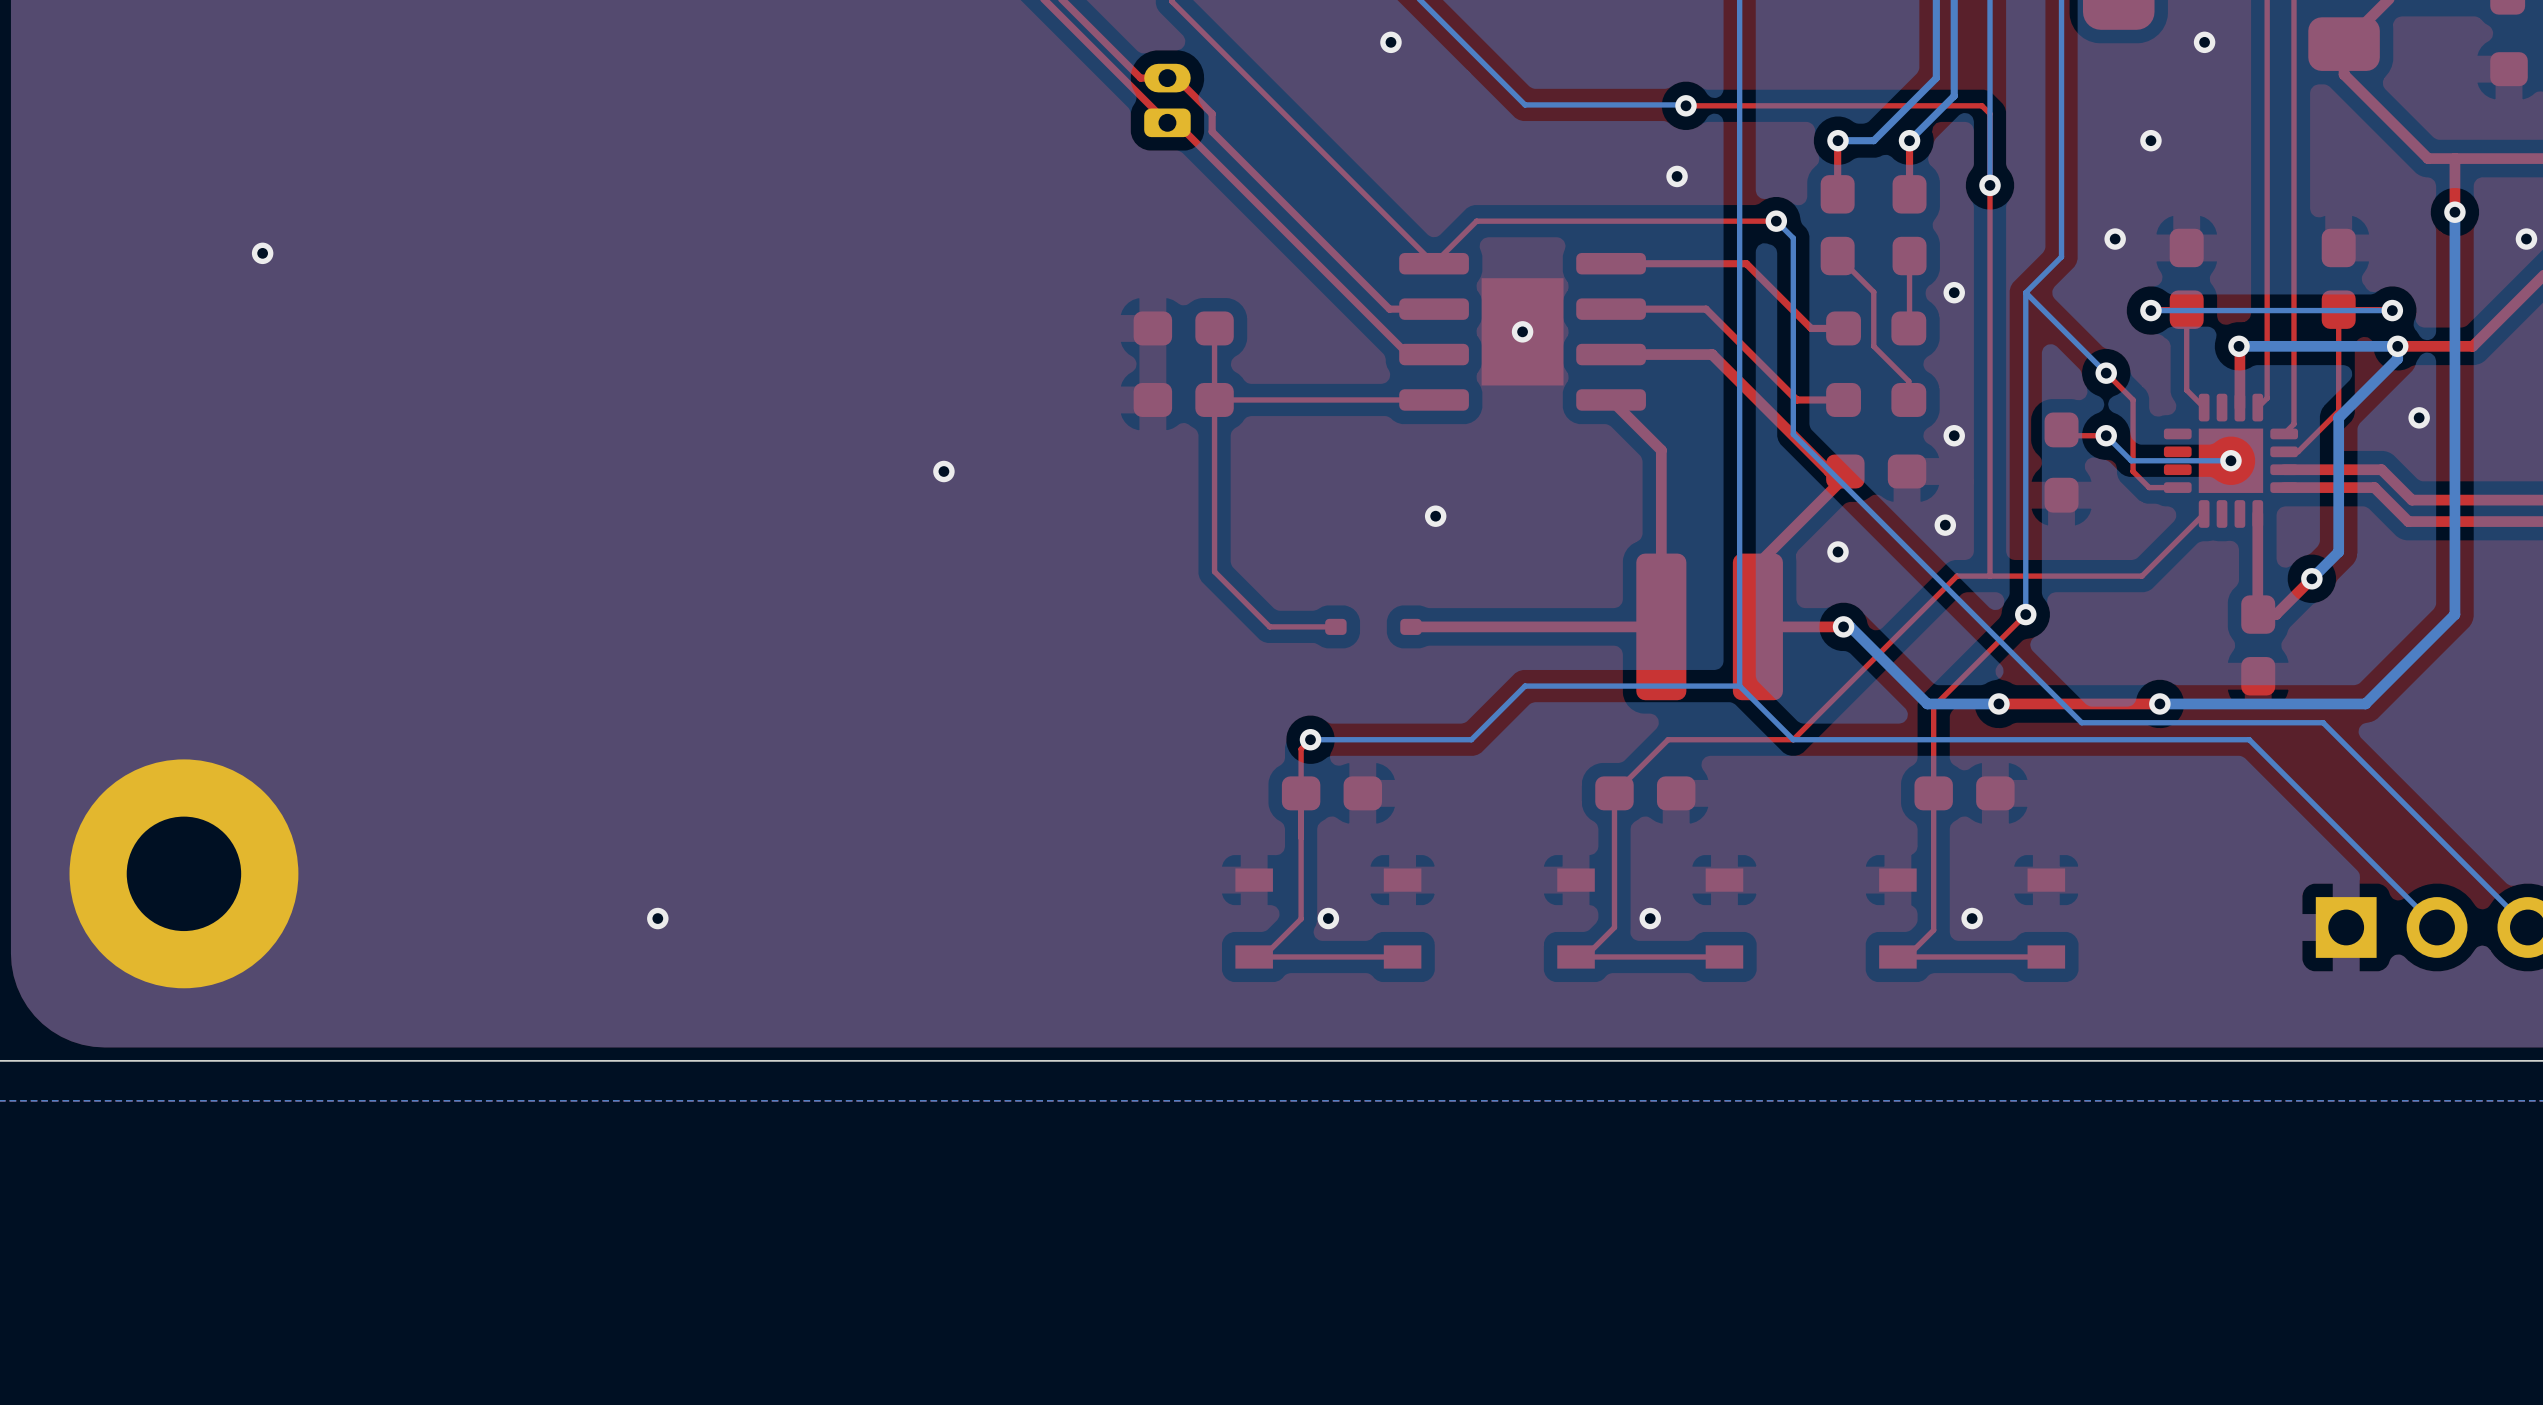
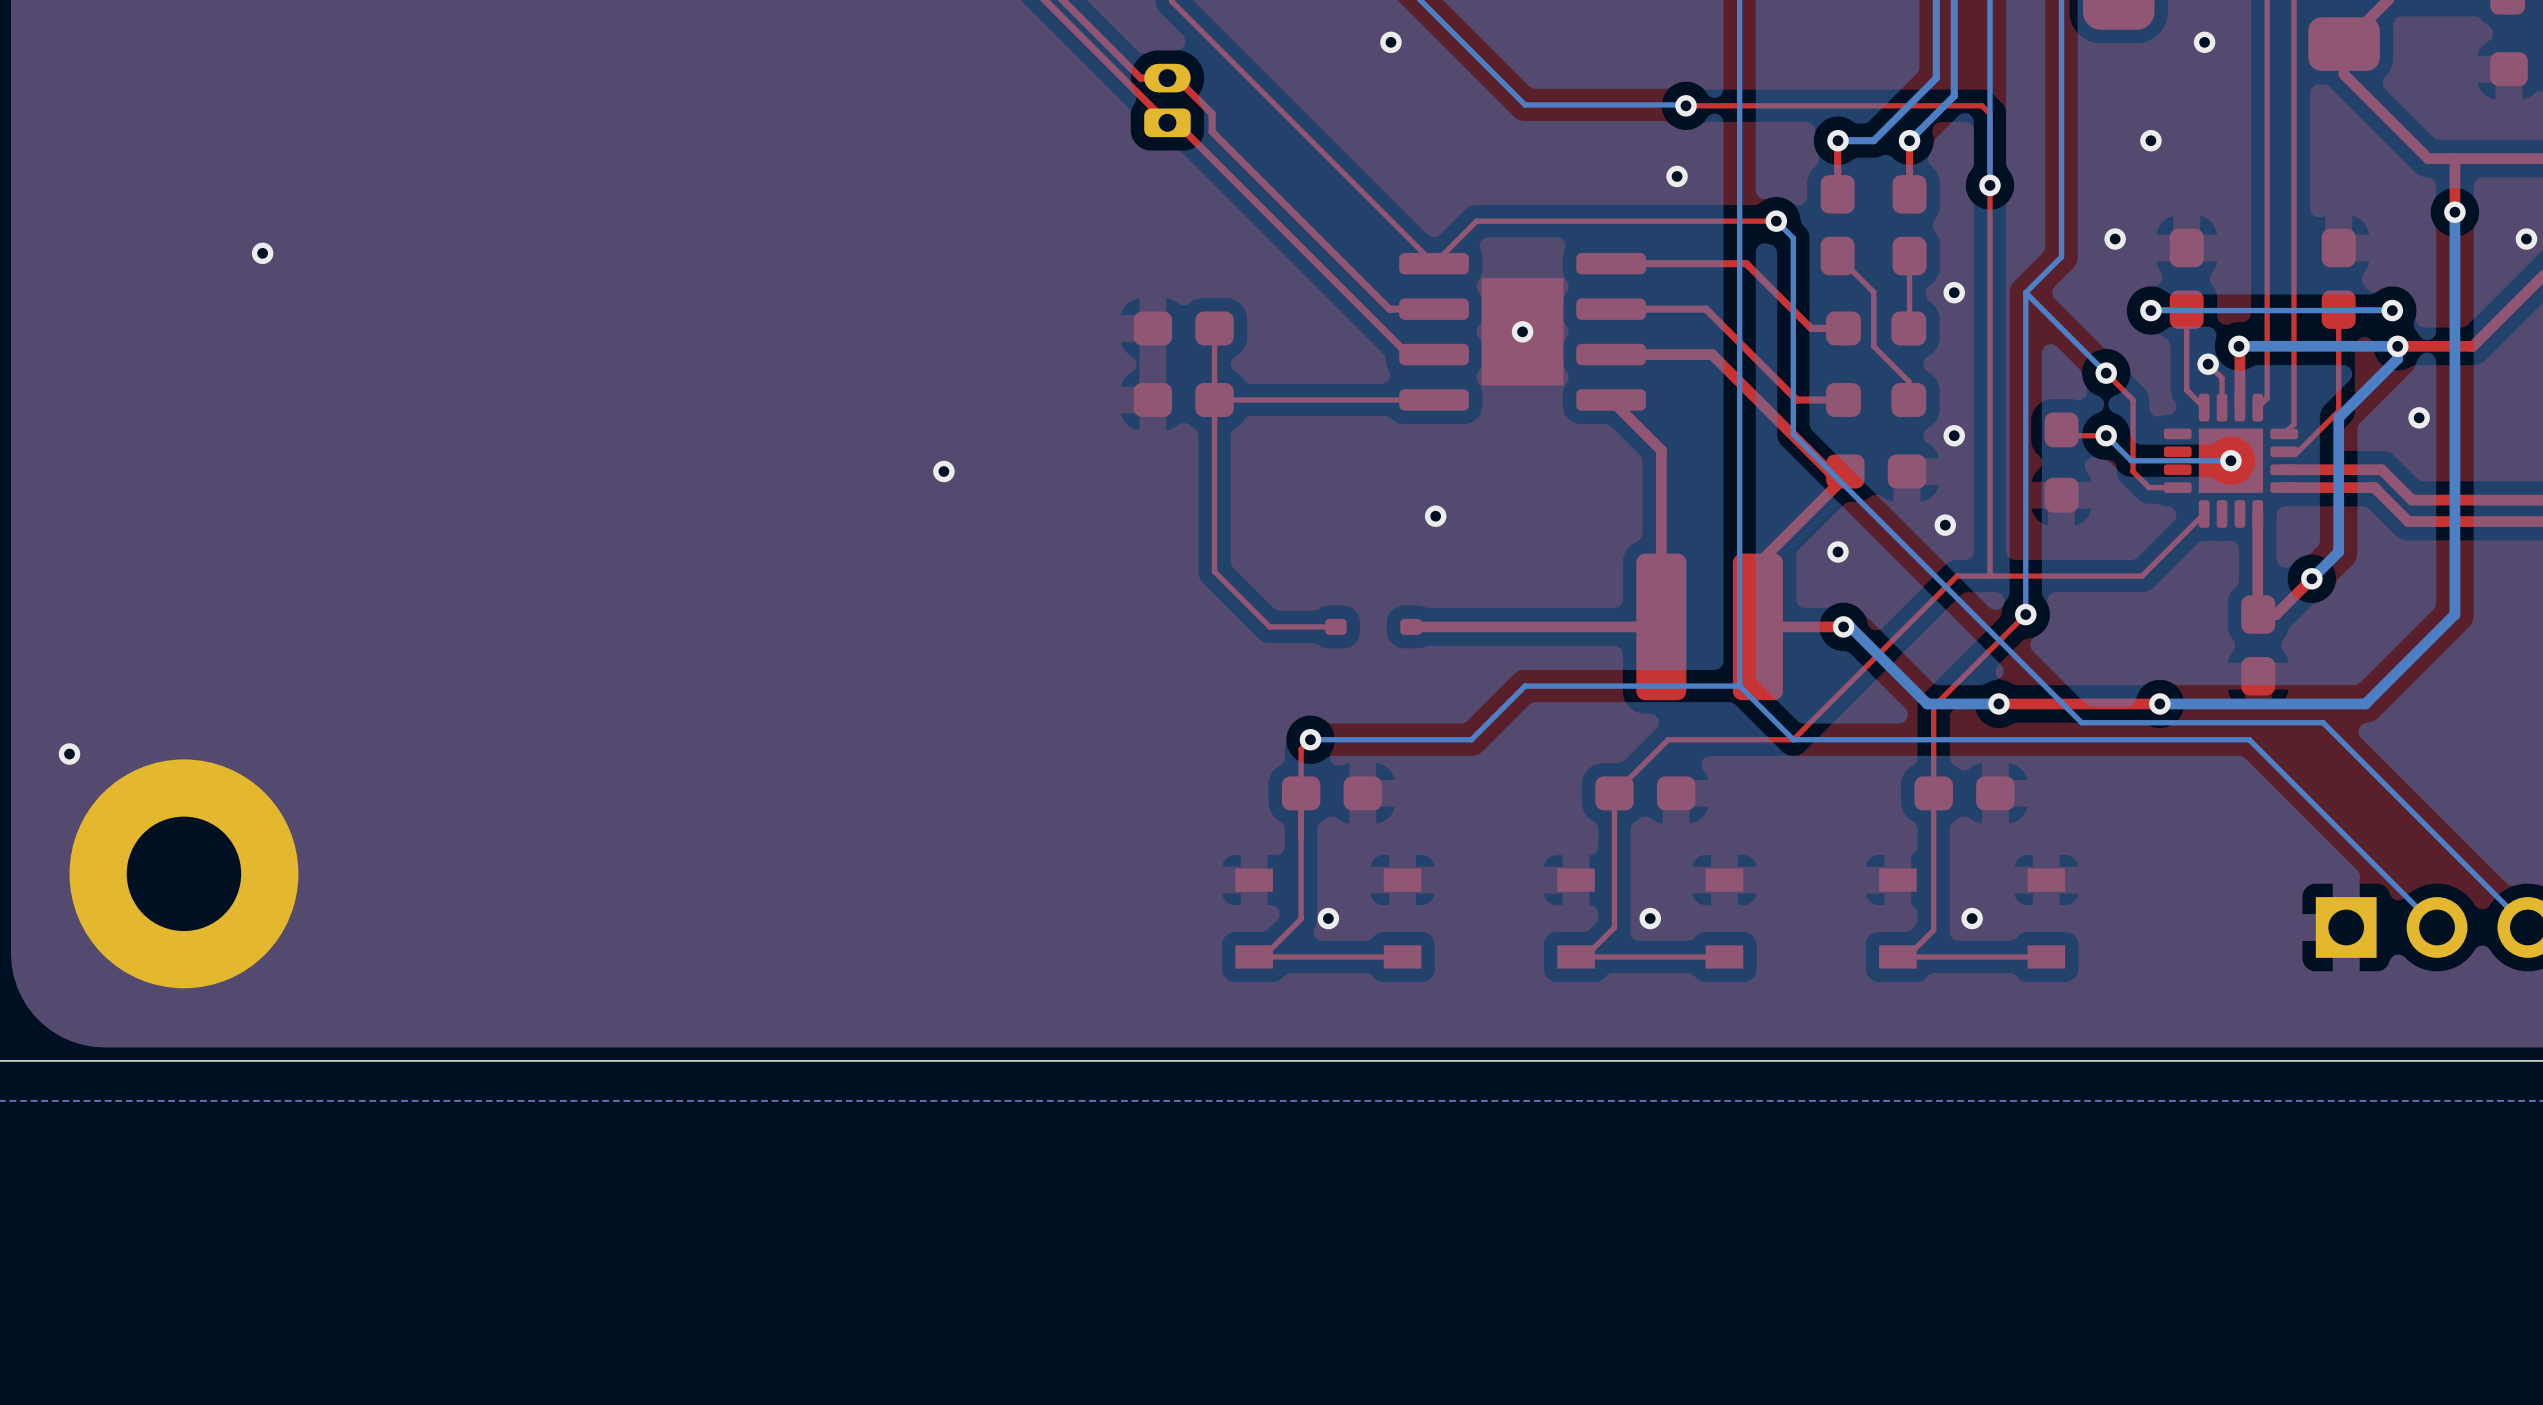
top track: none -> (2208, 364) (2222, 378) (2222, 407)
via: none -> (2208, 364)
via: none -> (69, 754)
via: (657, 918) -> none

